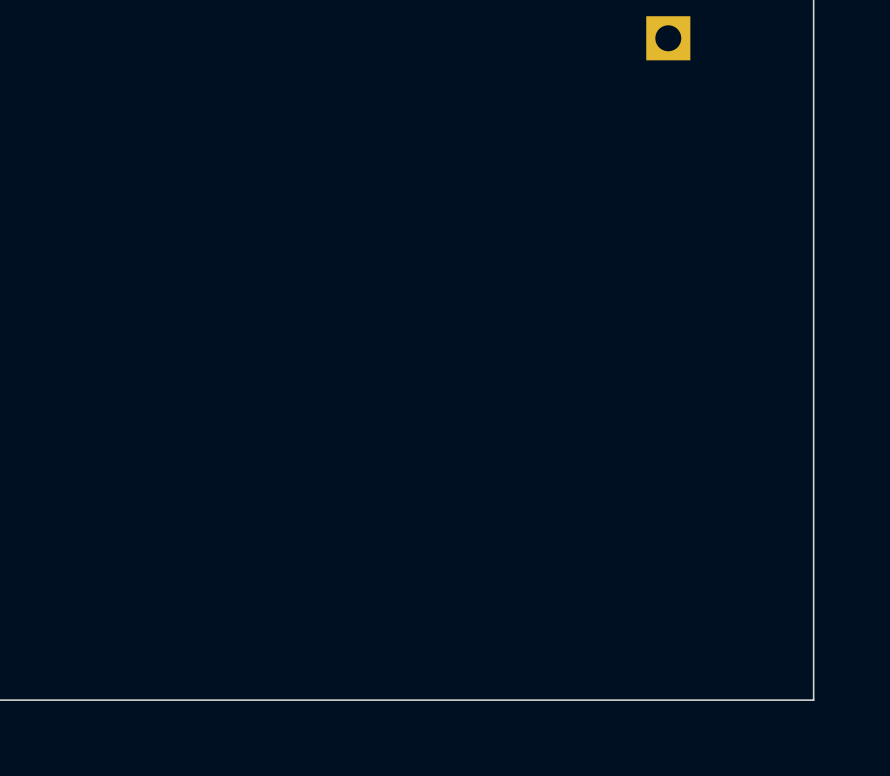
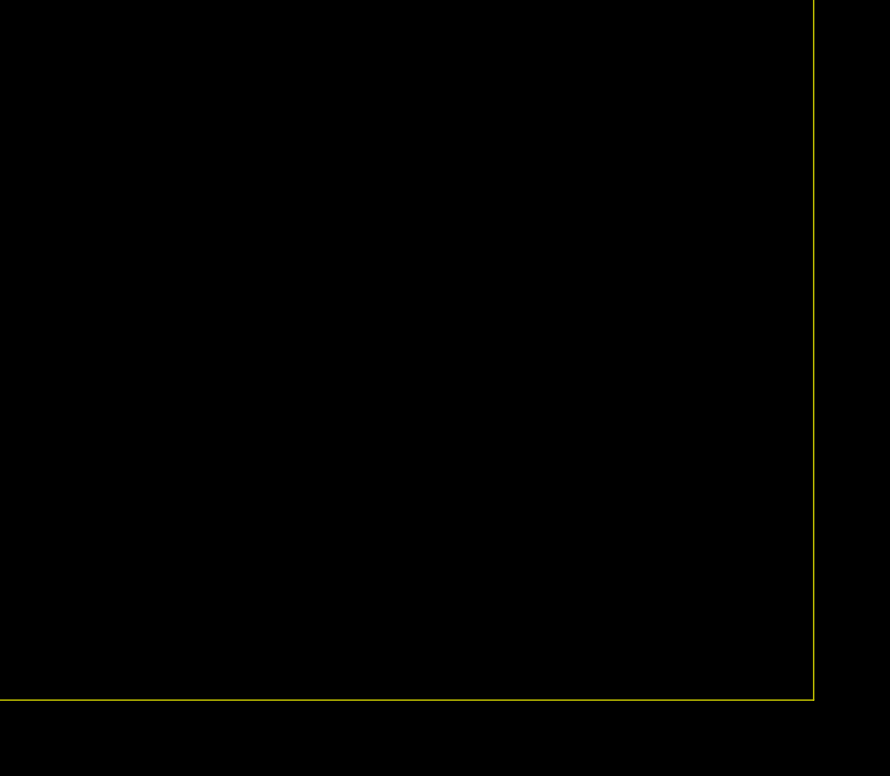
part: (668, 38) -> none

